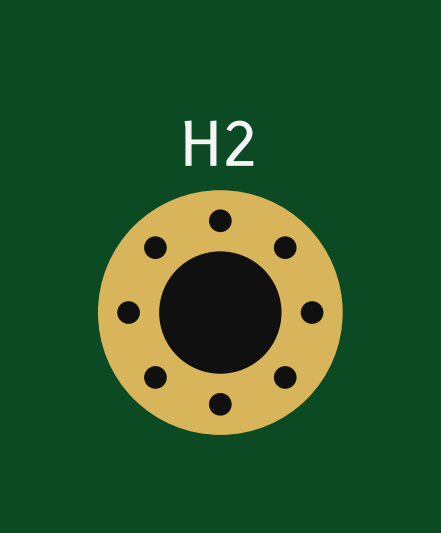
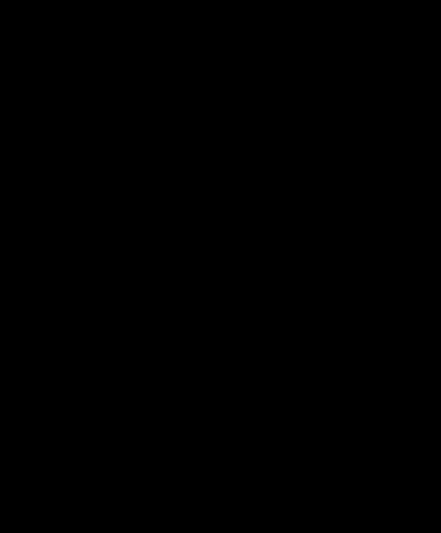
H2: (220, 312) -> none

